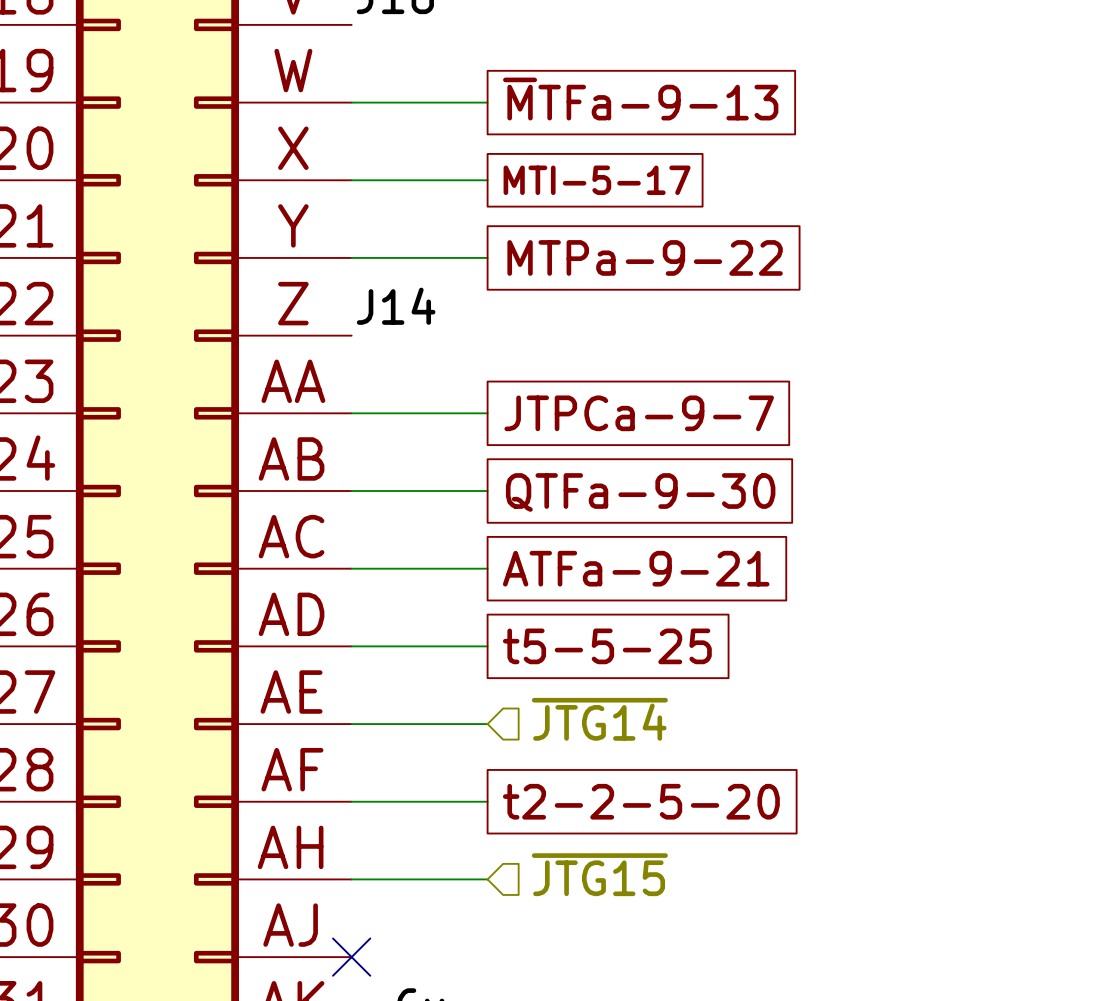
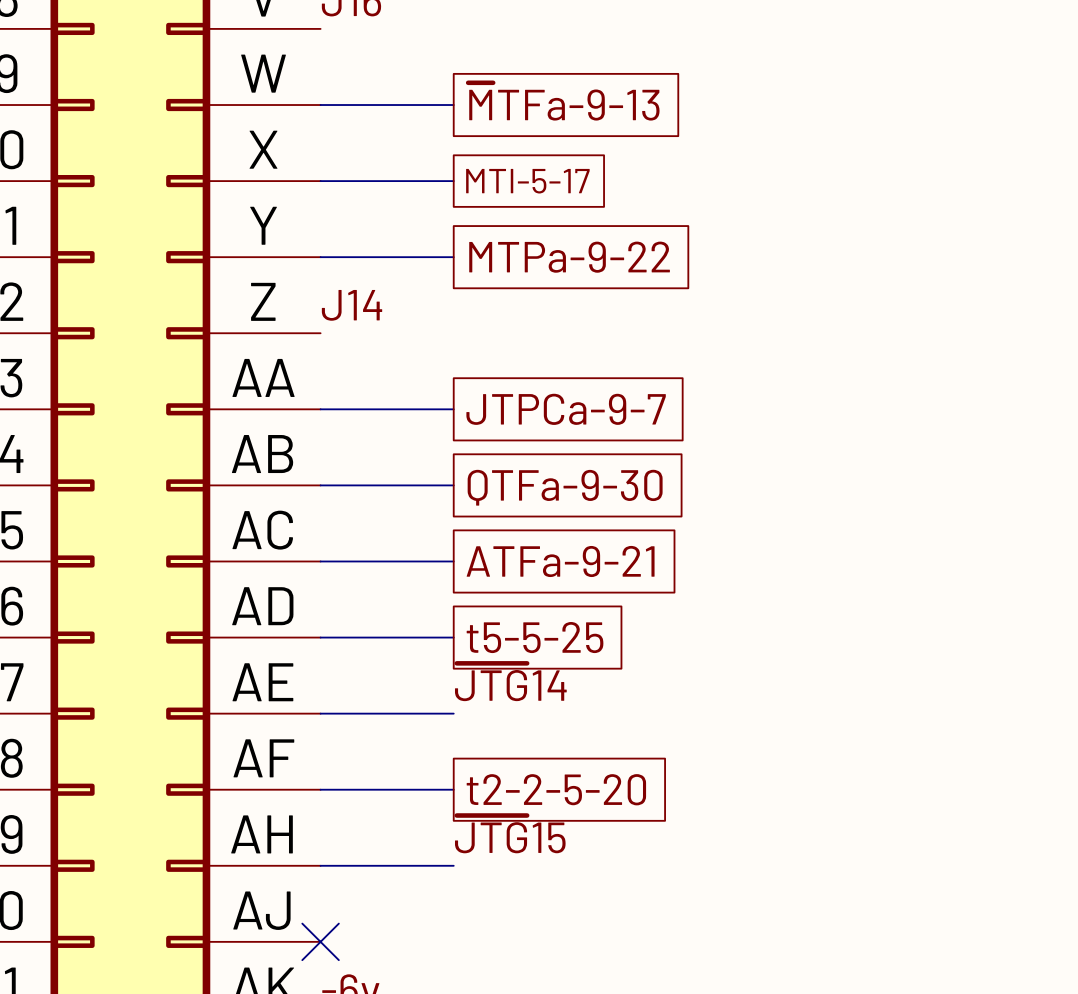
label: none -> ~{JTG}14 (510, 682)
hierarchical label: ~{JTG14} (599, 719) -> none
label: none -> ~{JTG}15 (510, 834)
hierarchical label: ~{JTG15} (599, 874) -> none

